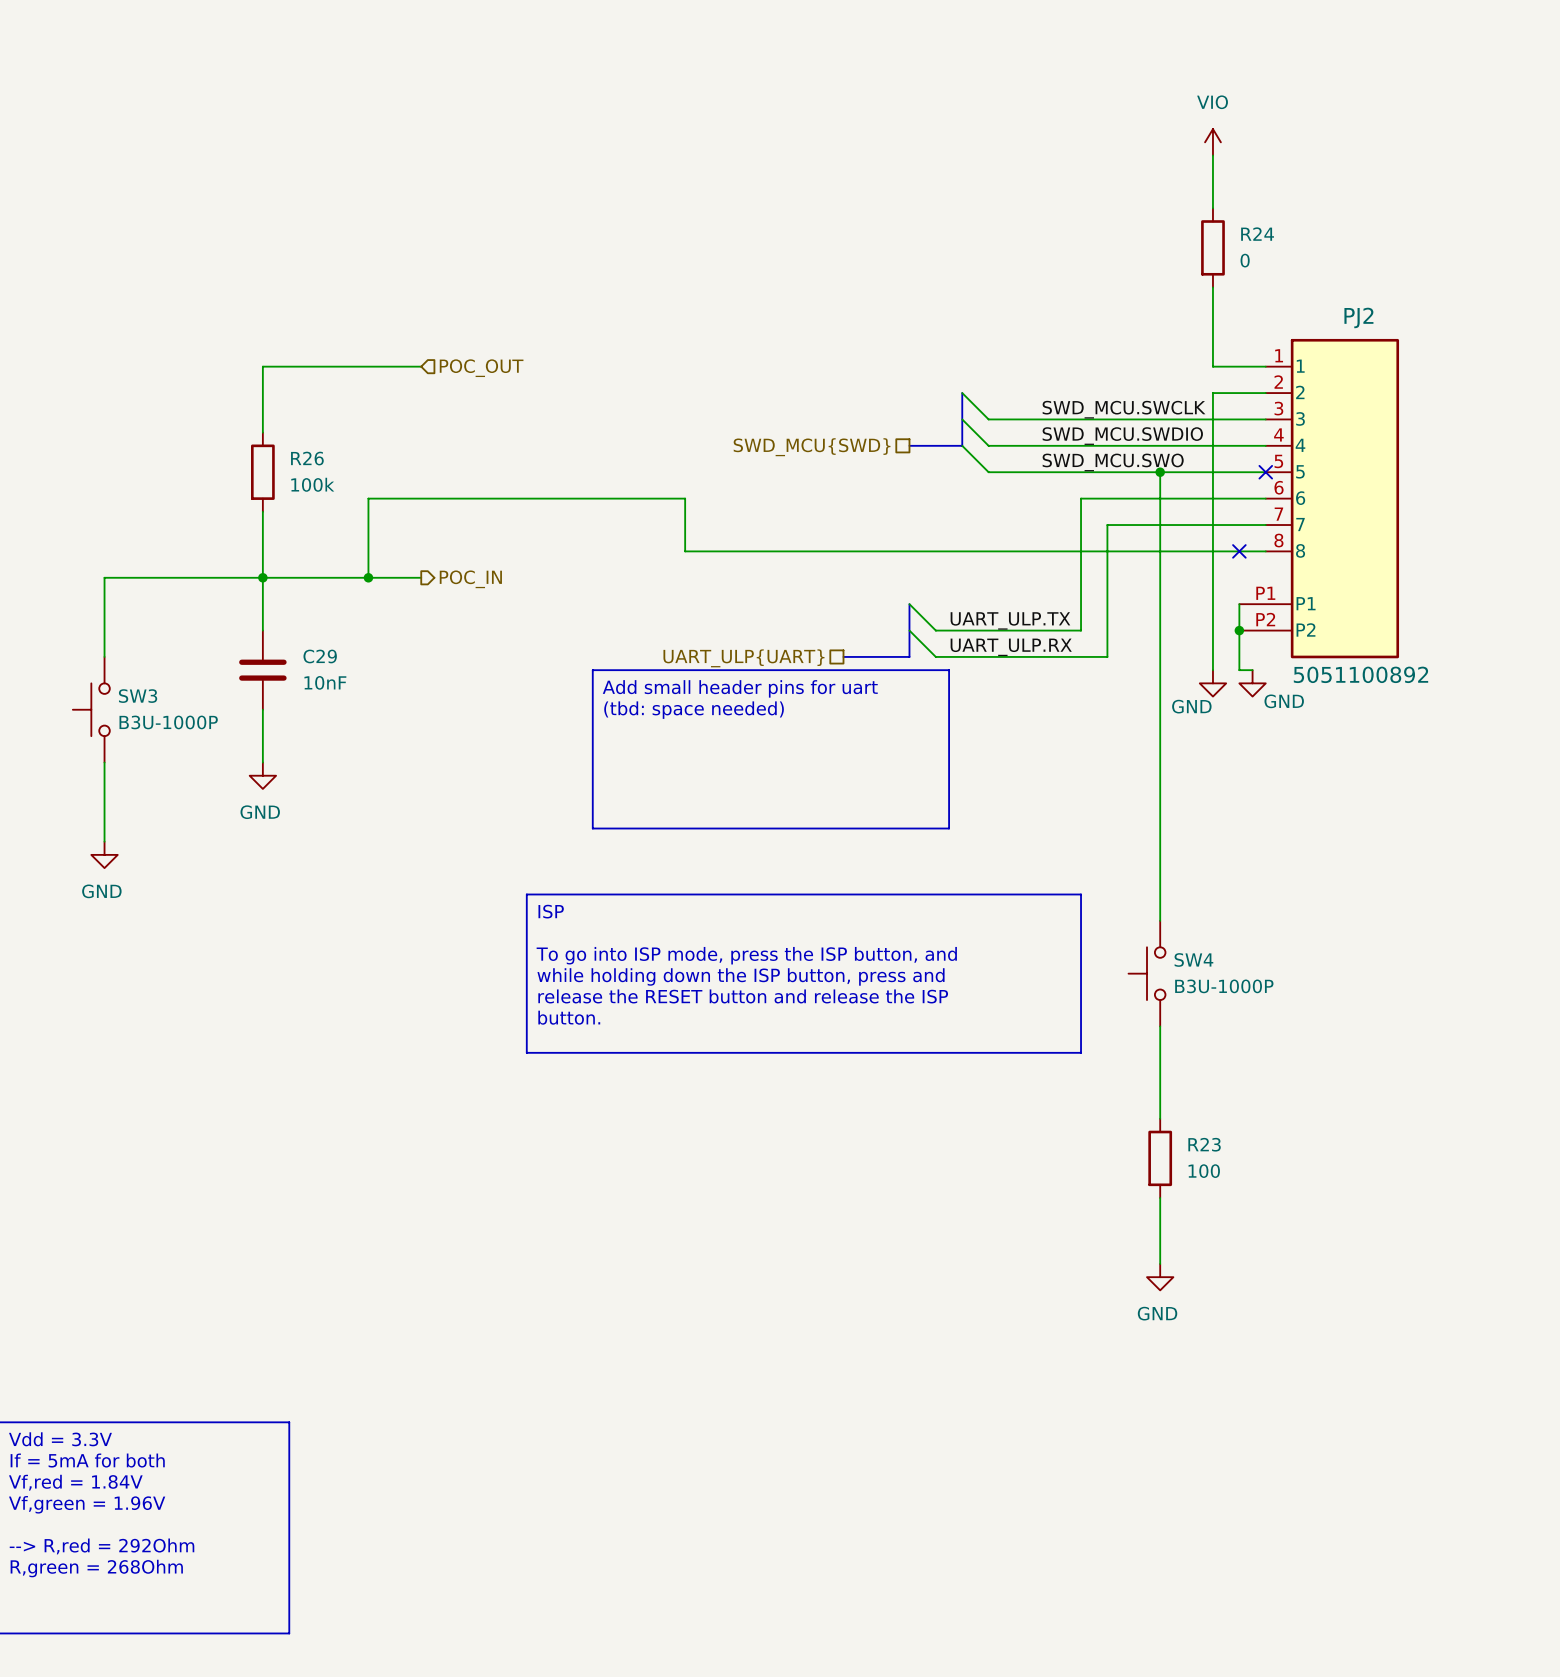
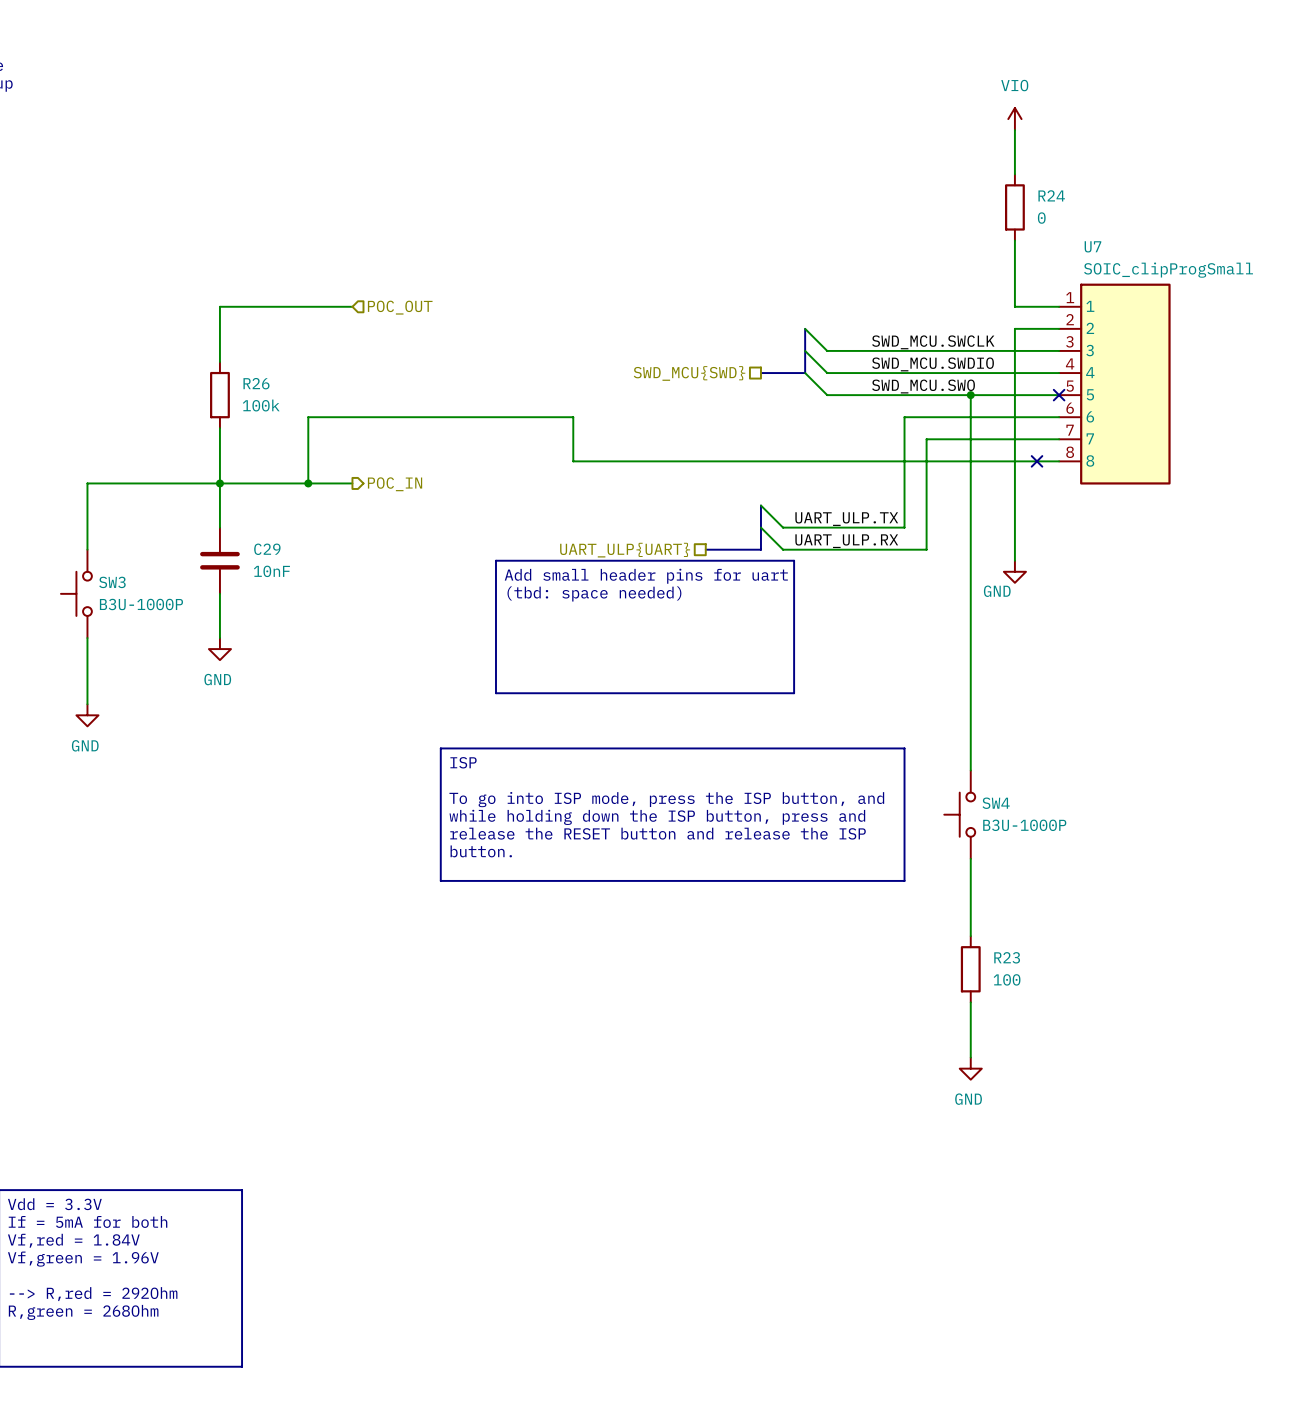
U7: none -> SOIC_clipProgSmall (1114, 384)
PJ2: 5051100892 (1319, 498) -> none
wire: (1239, 604) (1239, 670) (1252, 670) -> none
junction: (1239, 630) -> none
power symbol: GND (1252, 683) -> none

